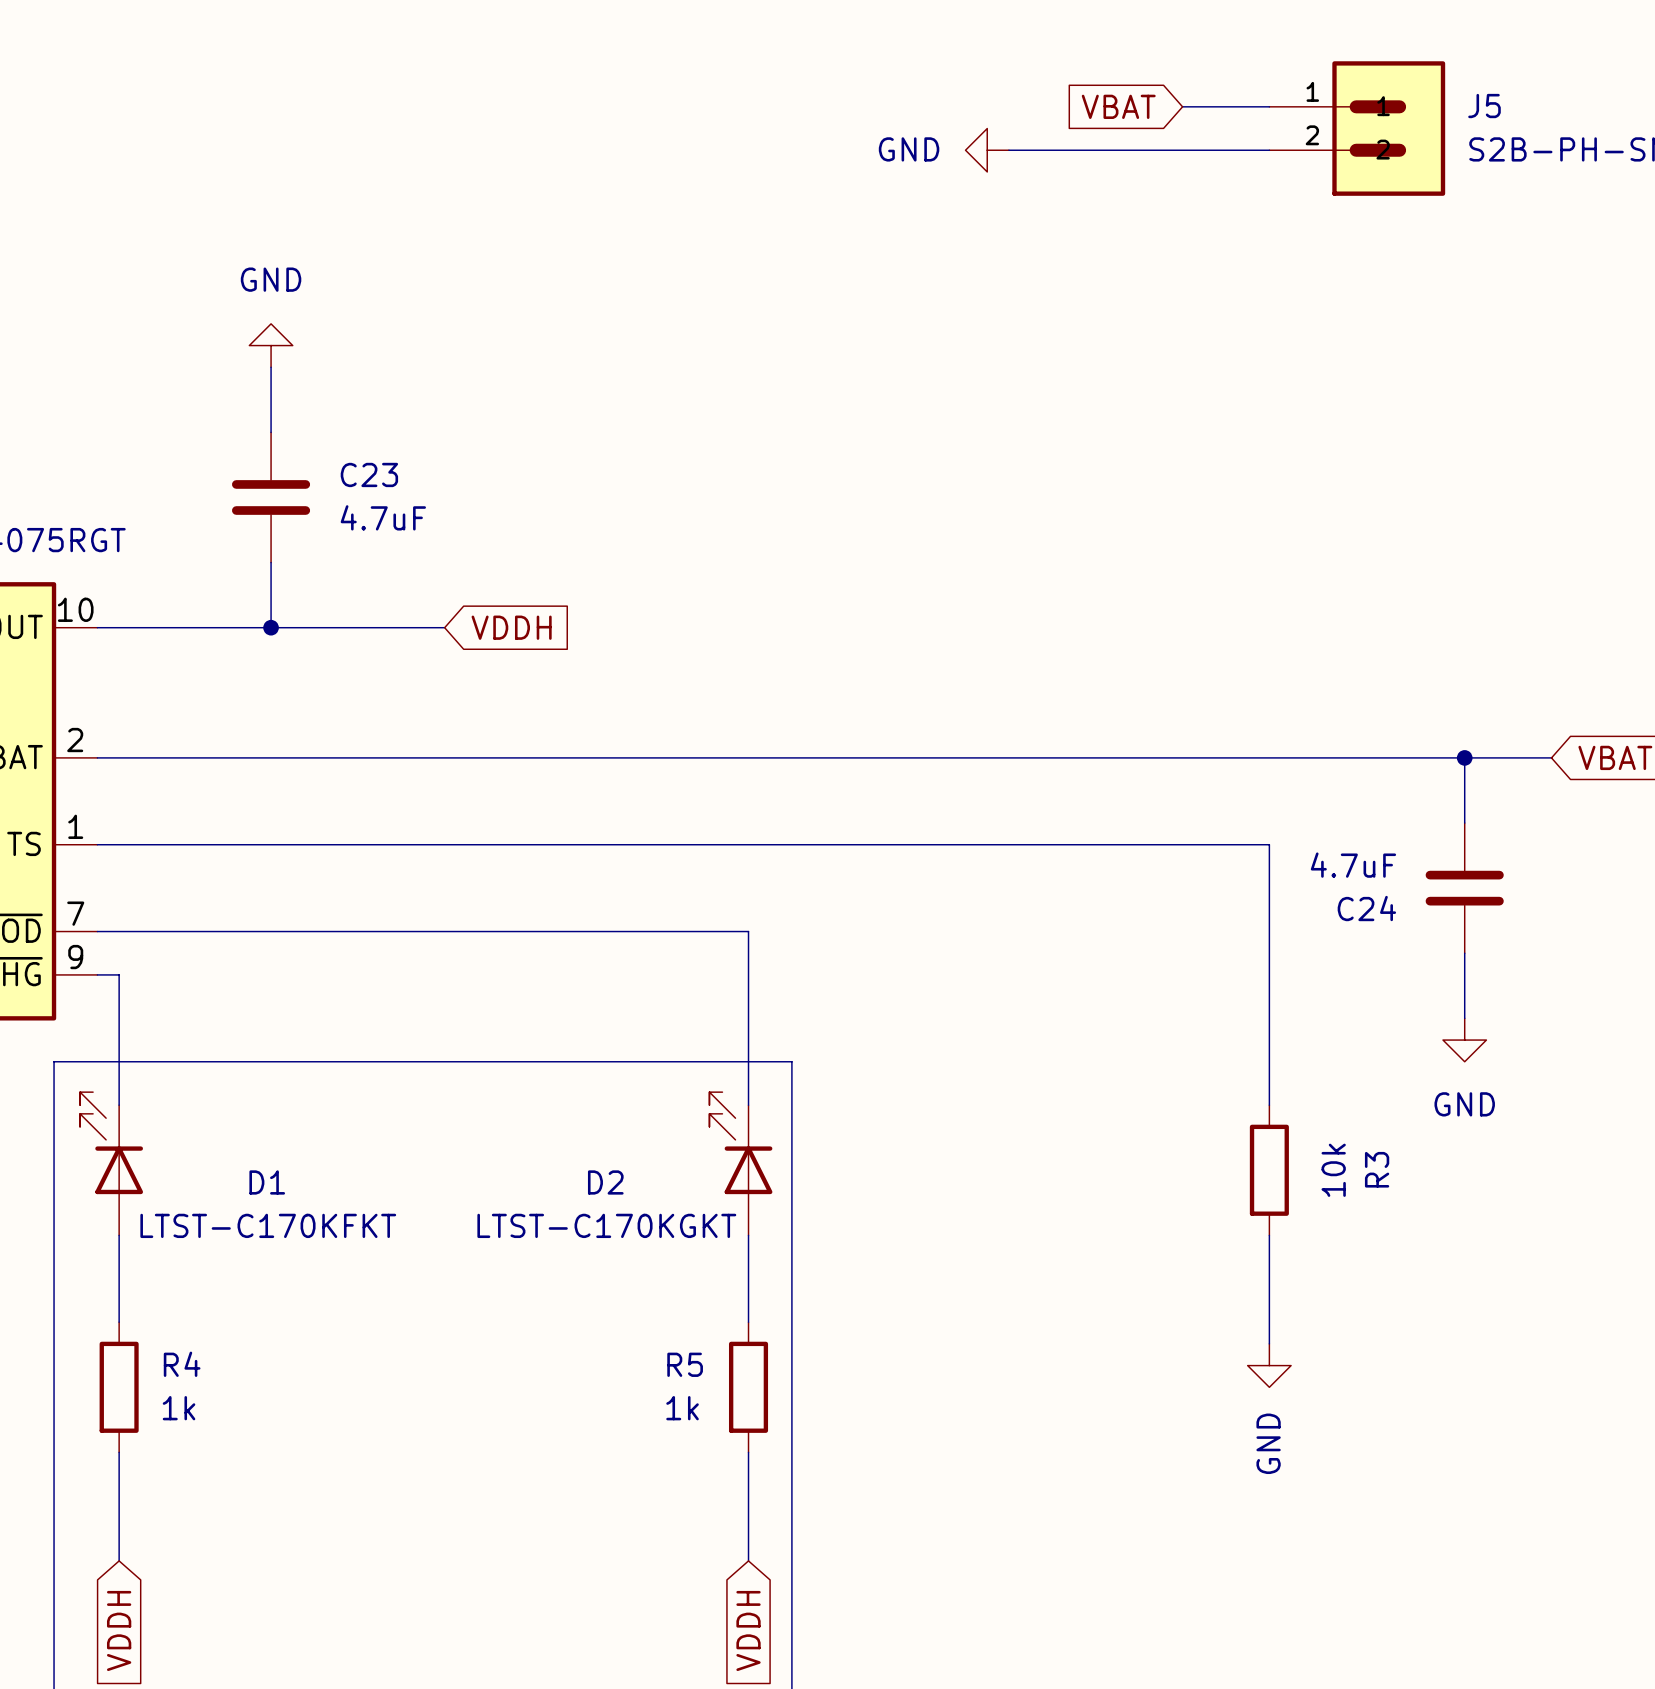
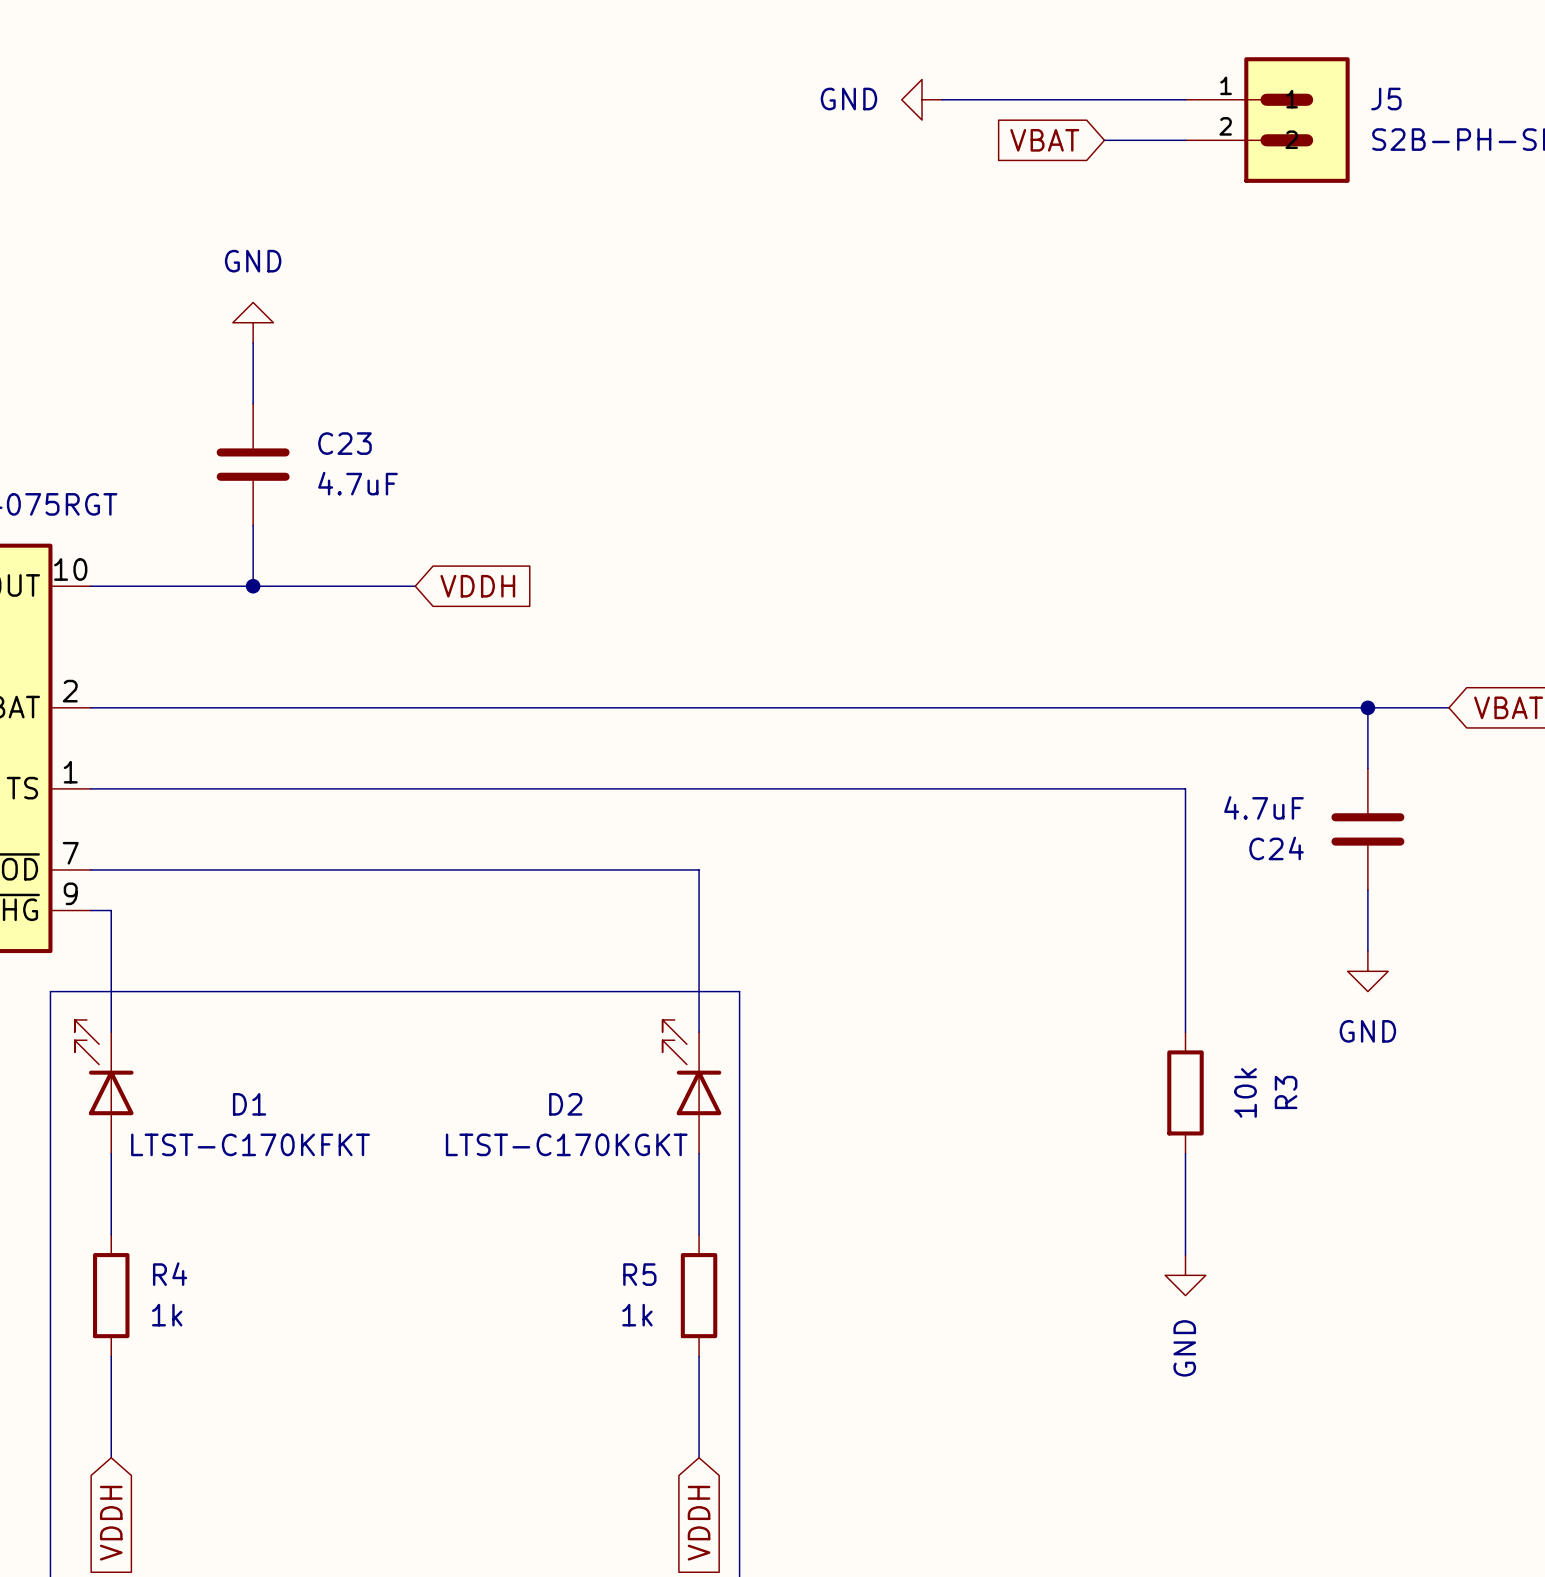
global label position: VBAT (1118, 106) -> VBAT (1044, 140)
power symbol position: GND (987, 150) -> GND (922, 99)
wire: (1008, 150) (1182, 150) -> (942, 99) (1104, 99)

